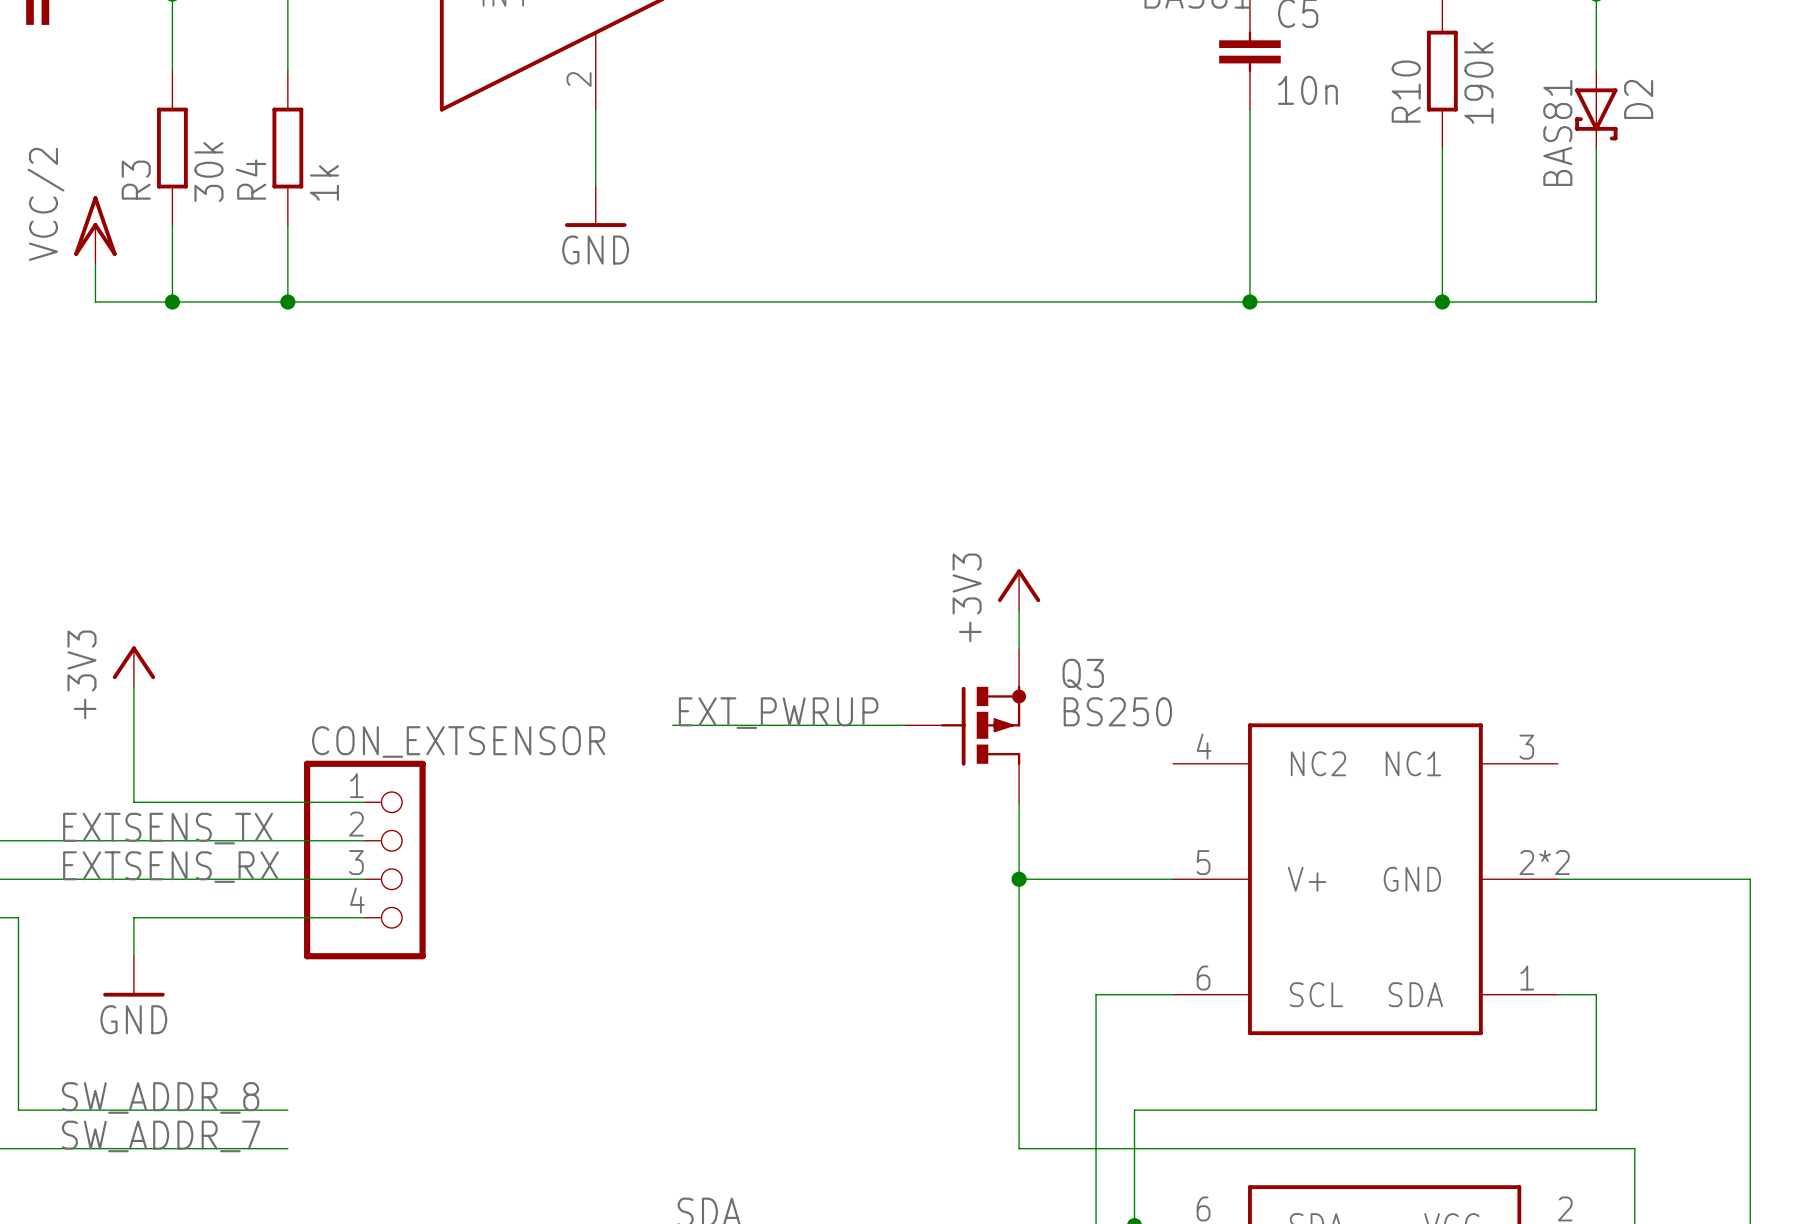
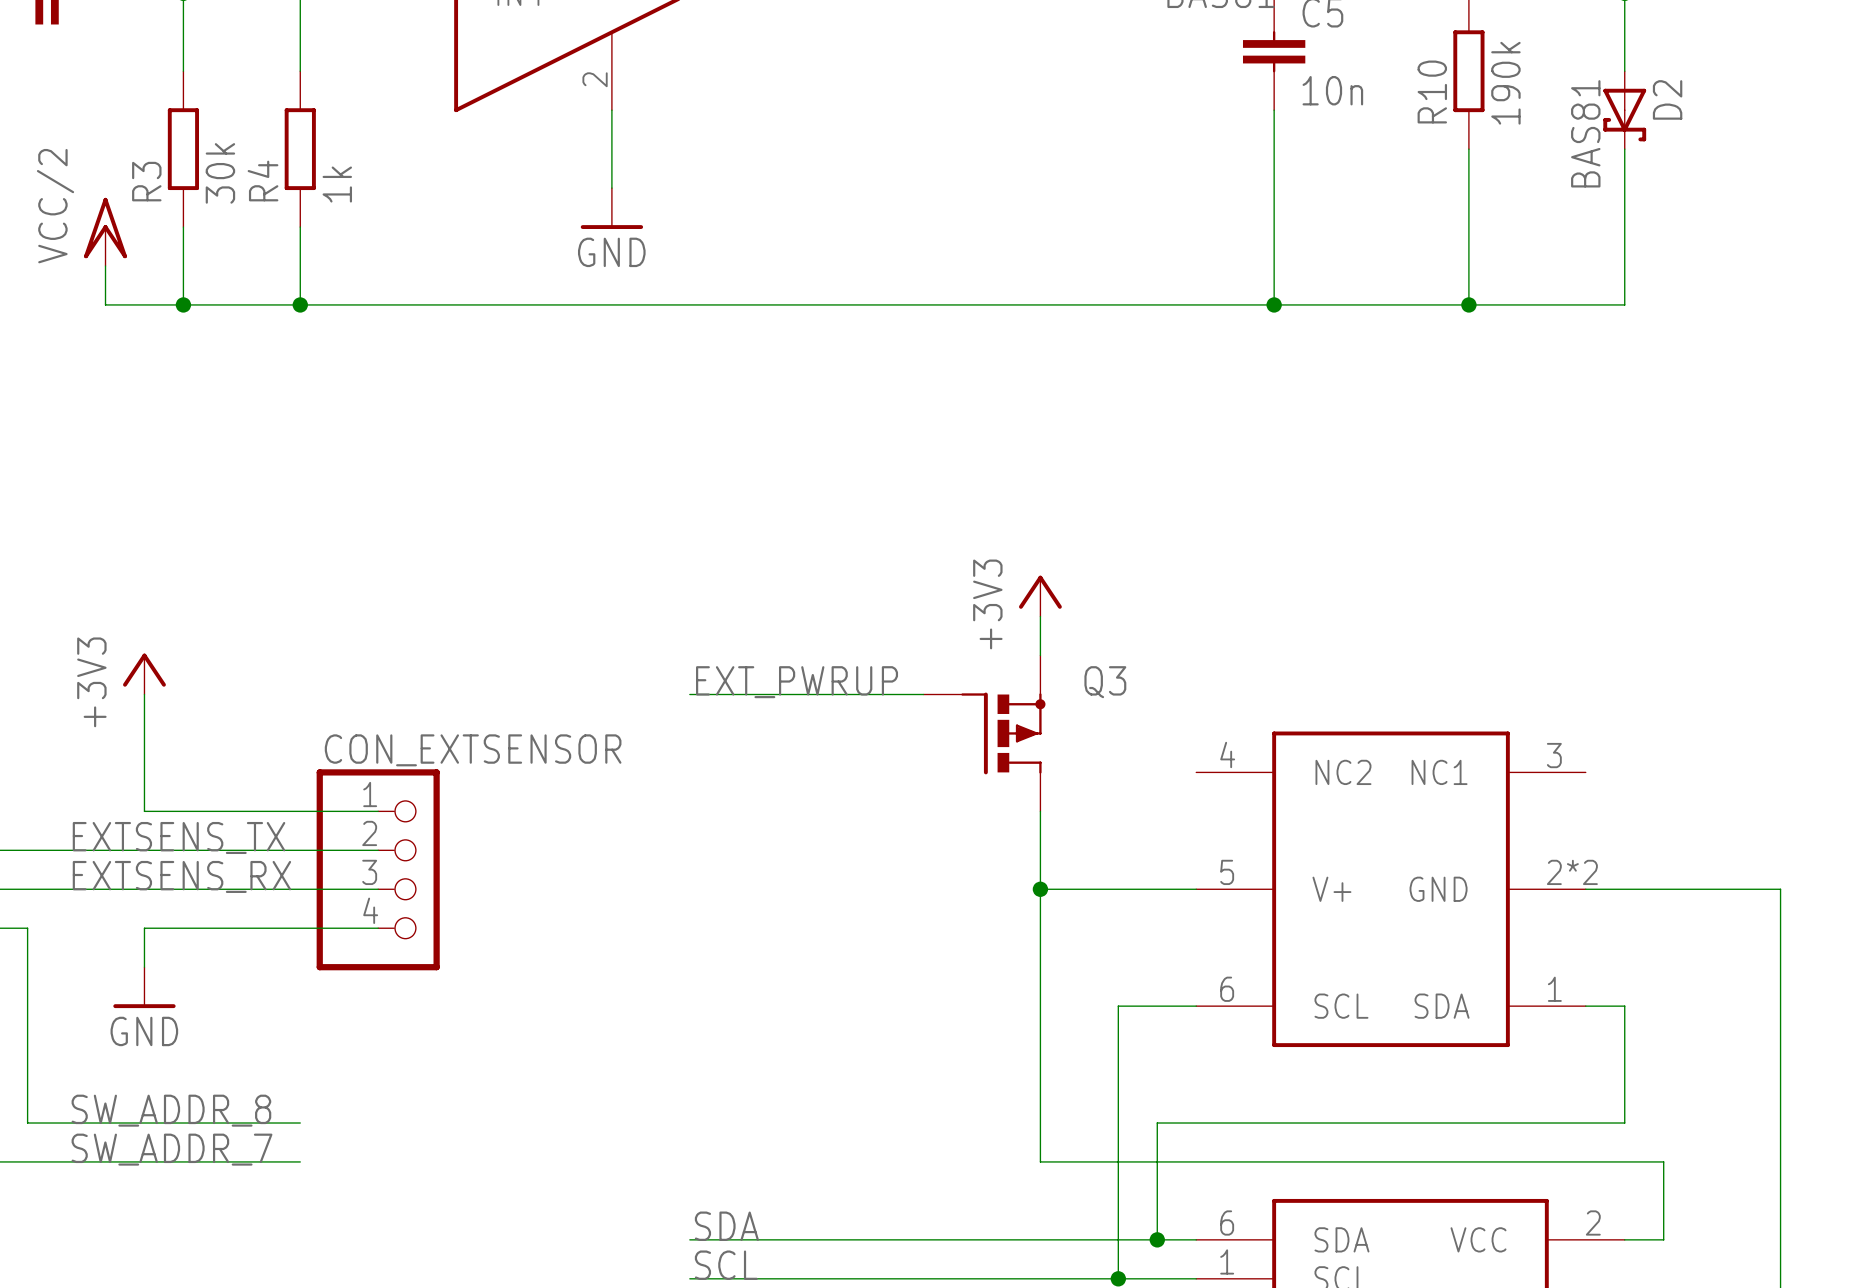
Q3 symbol: [903, 648, 1026, 803] -> [923, 655, 1046, 812]
Q3 value: BS250 (1117, 711) -> none
label position: EXT_PWRUP (778, 713) -> EXT_PWRUP (797, 682)
wire: (672, 725) (903, 725) -> (689, 694) (923, 694)

